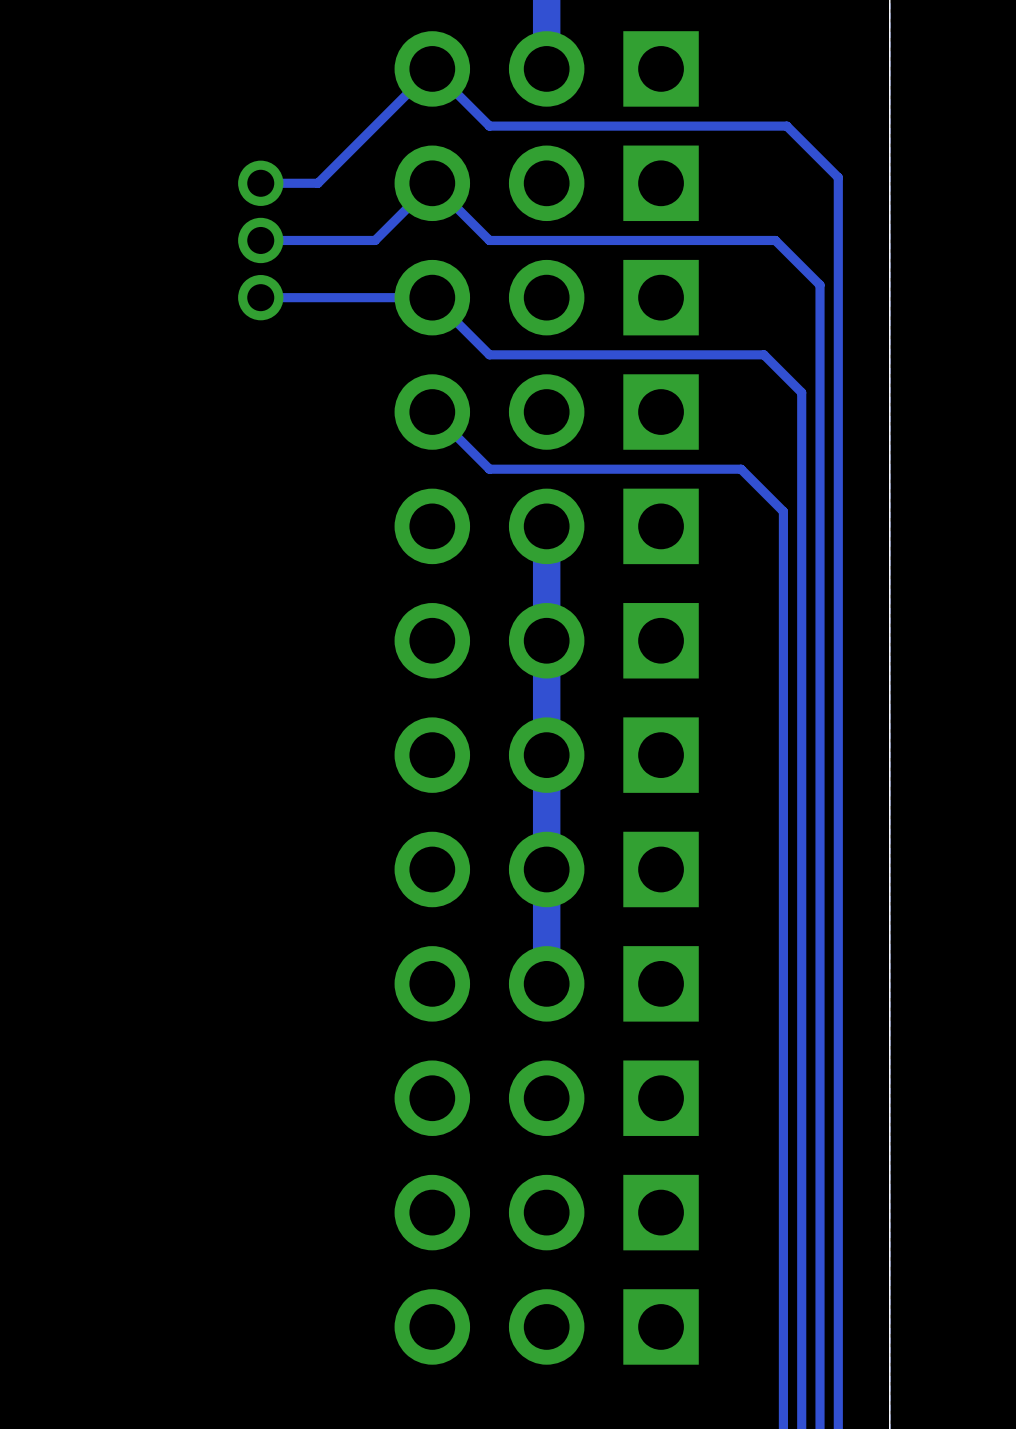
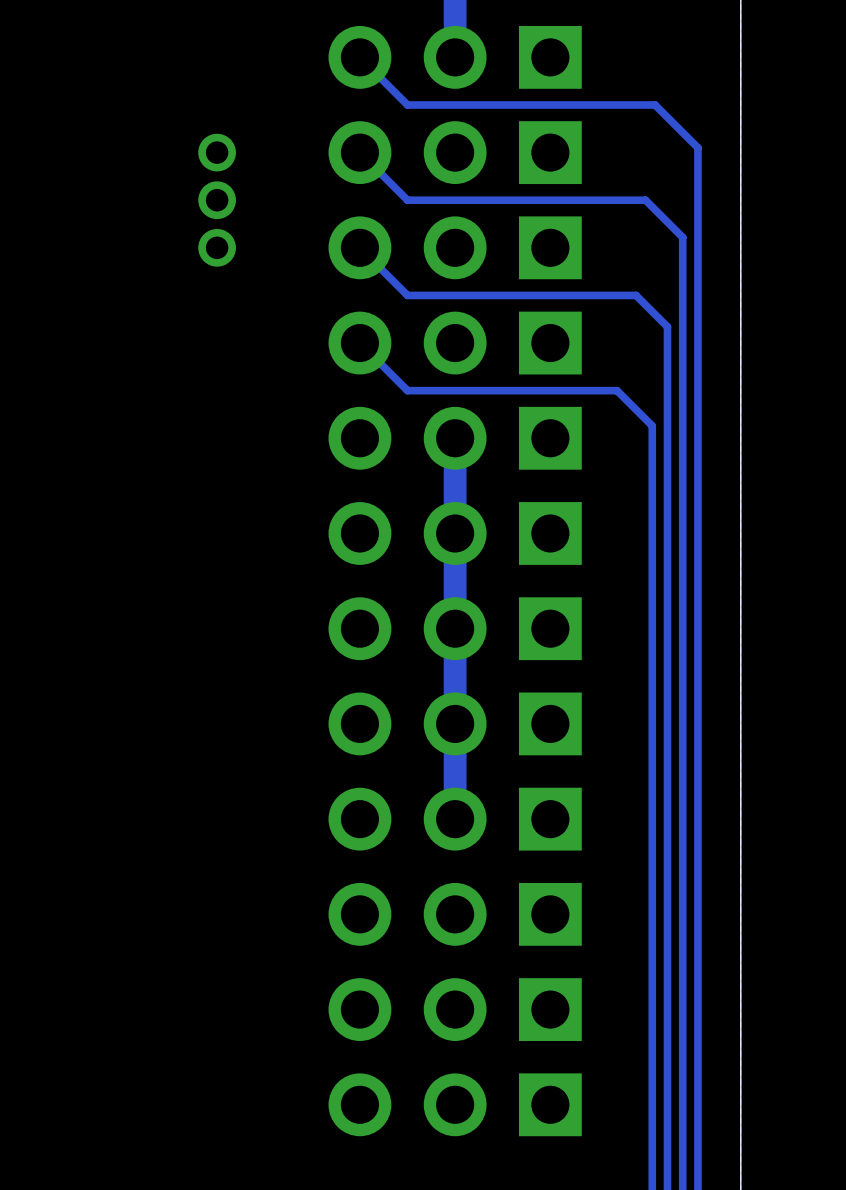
track: (432, 68) (317, 183) (260, 183) -> none
track: (432, 183) (375, 240) (260, 240) -> none
track: (432, 297) (260, 297) -> none

